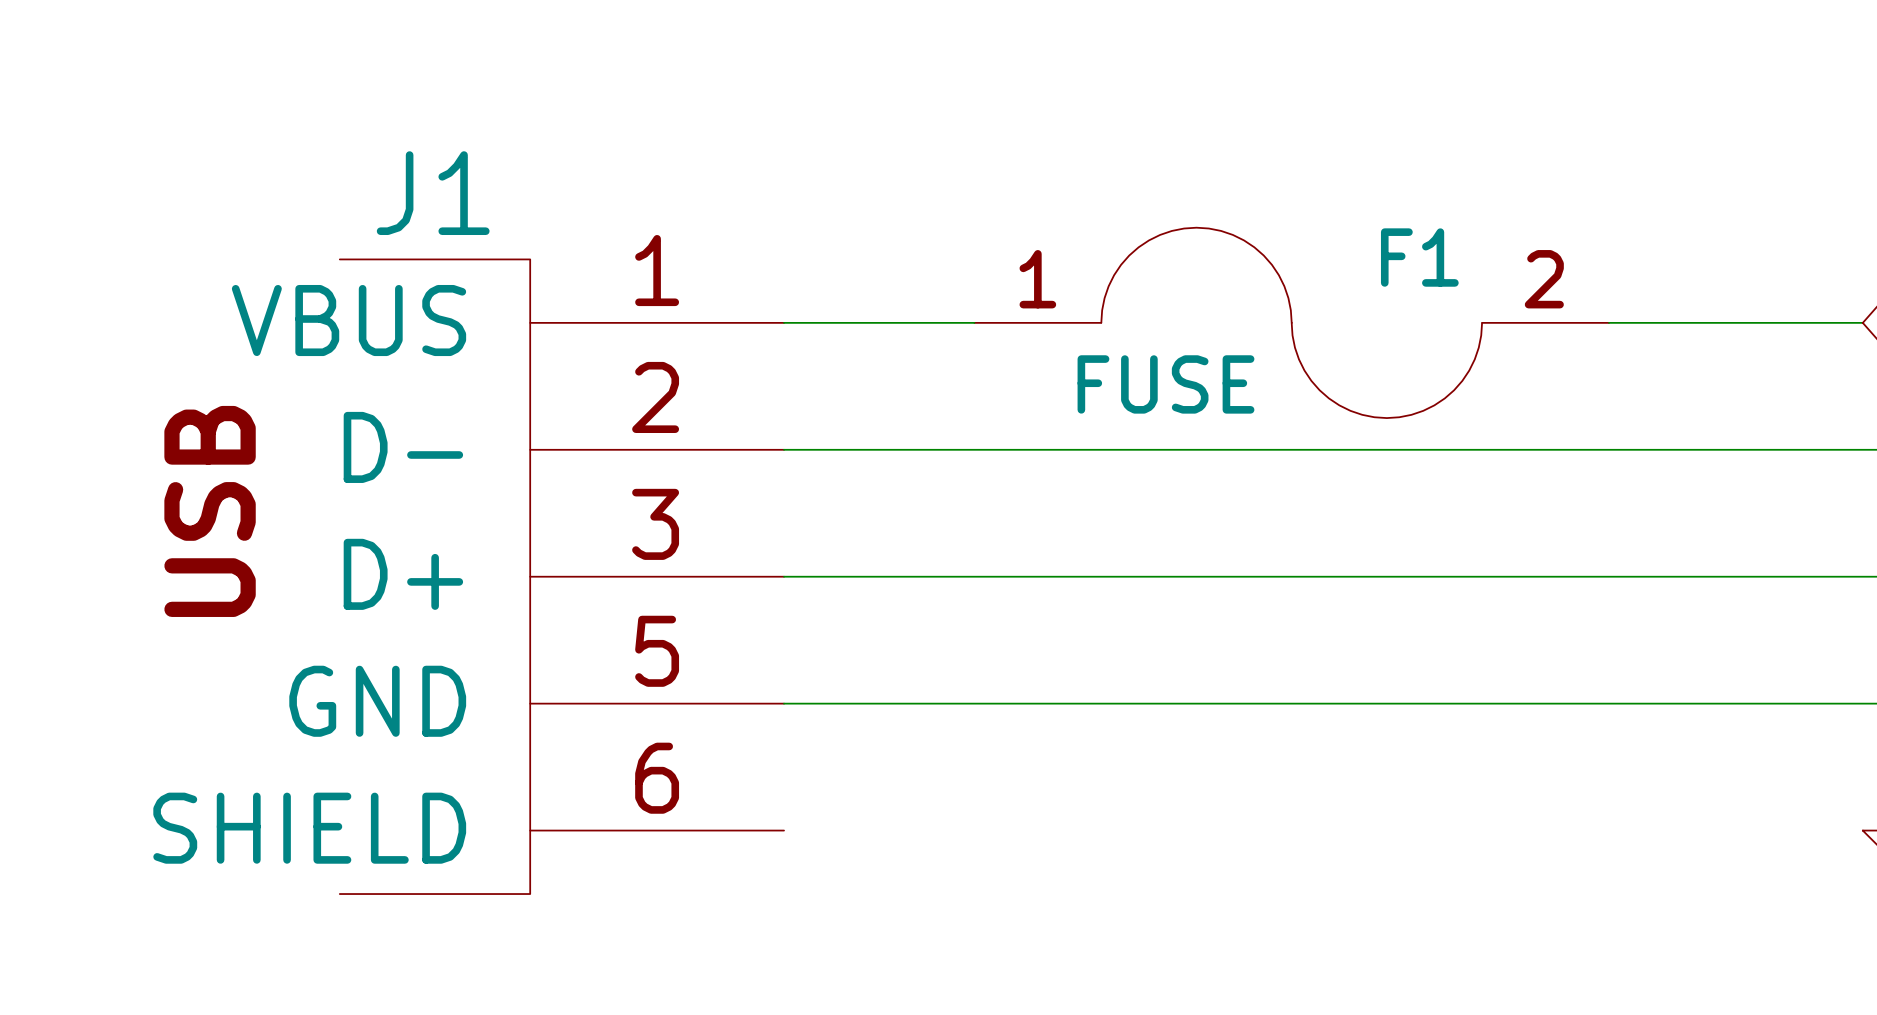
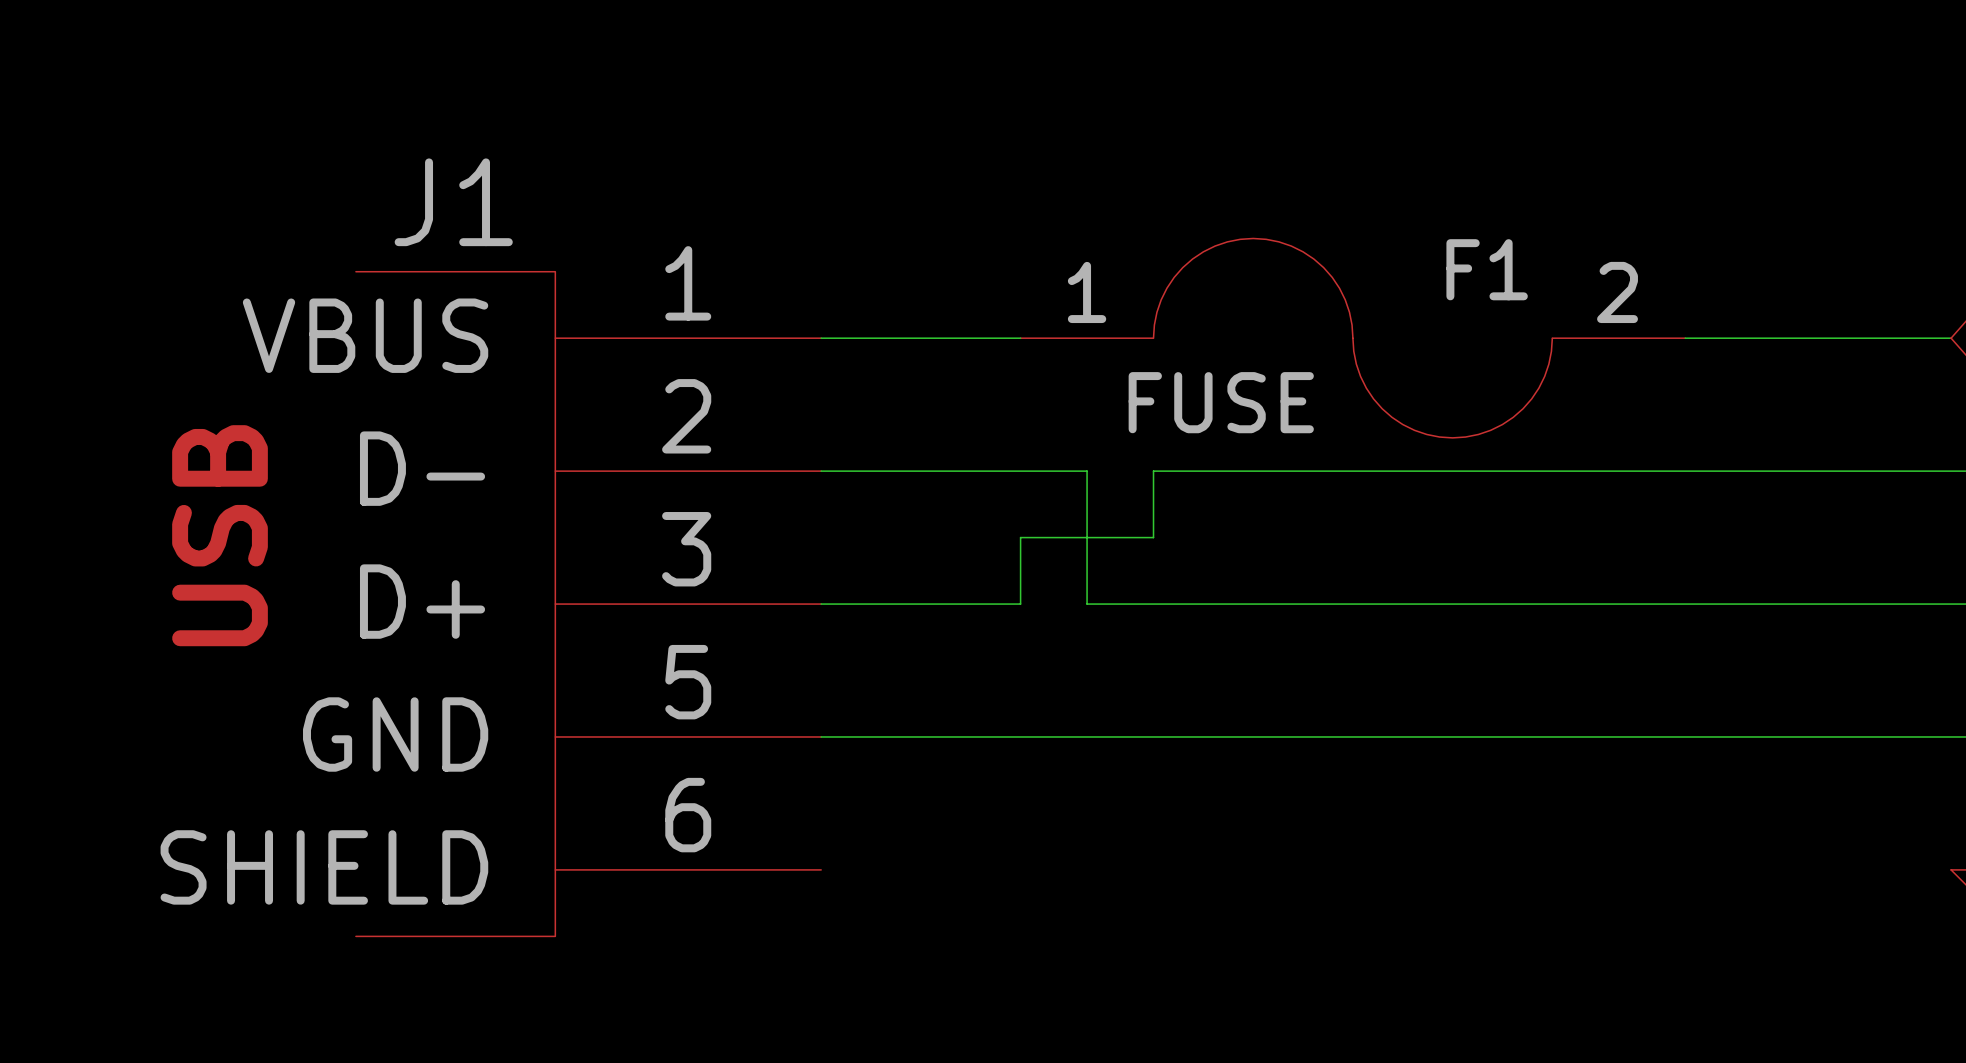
wire: (1037, 449) (1101, 449) -> (1020, 604) (1020, 537) (1153, 537) (1153, 471)
wire: (974, 576) (1037, 576) -> (1087, 471) (1087, 604)

